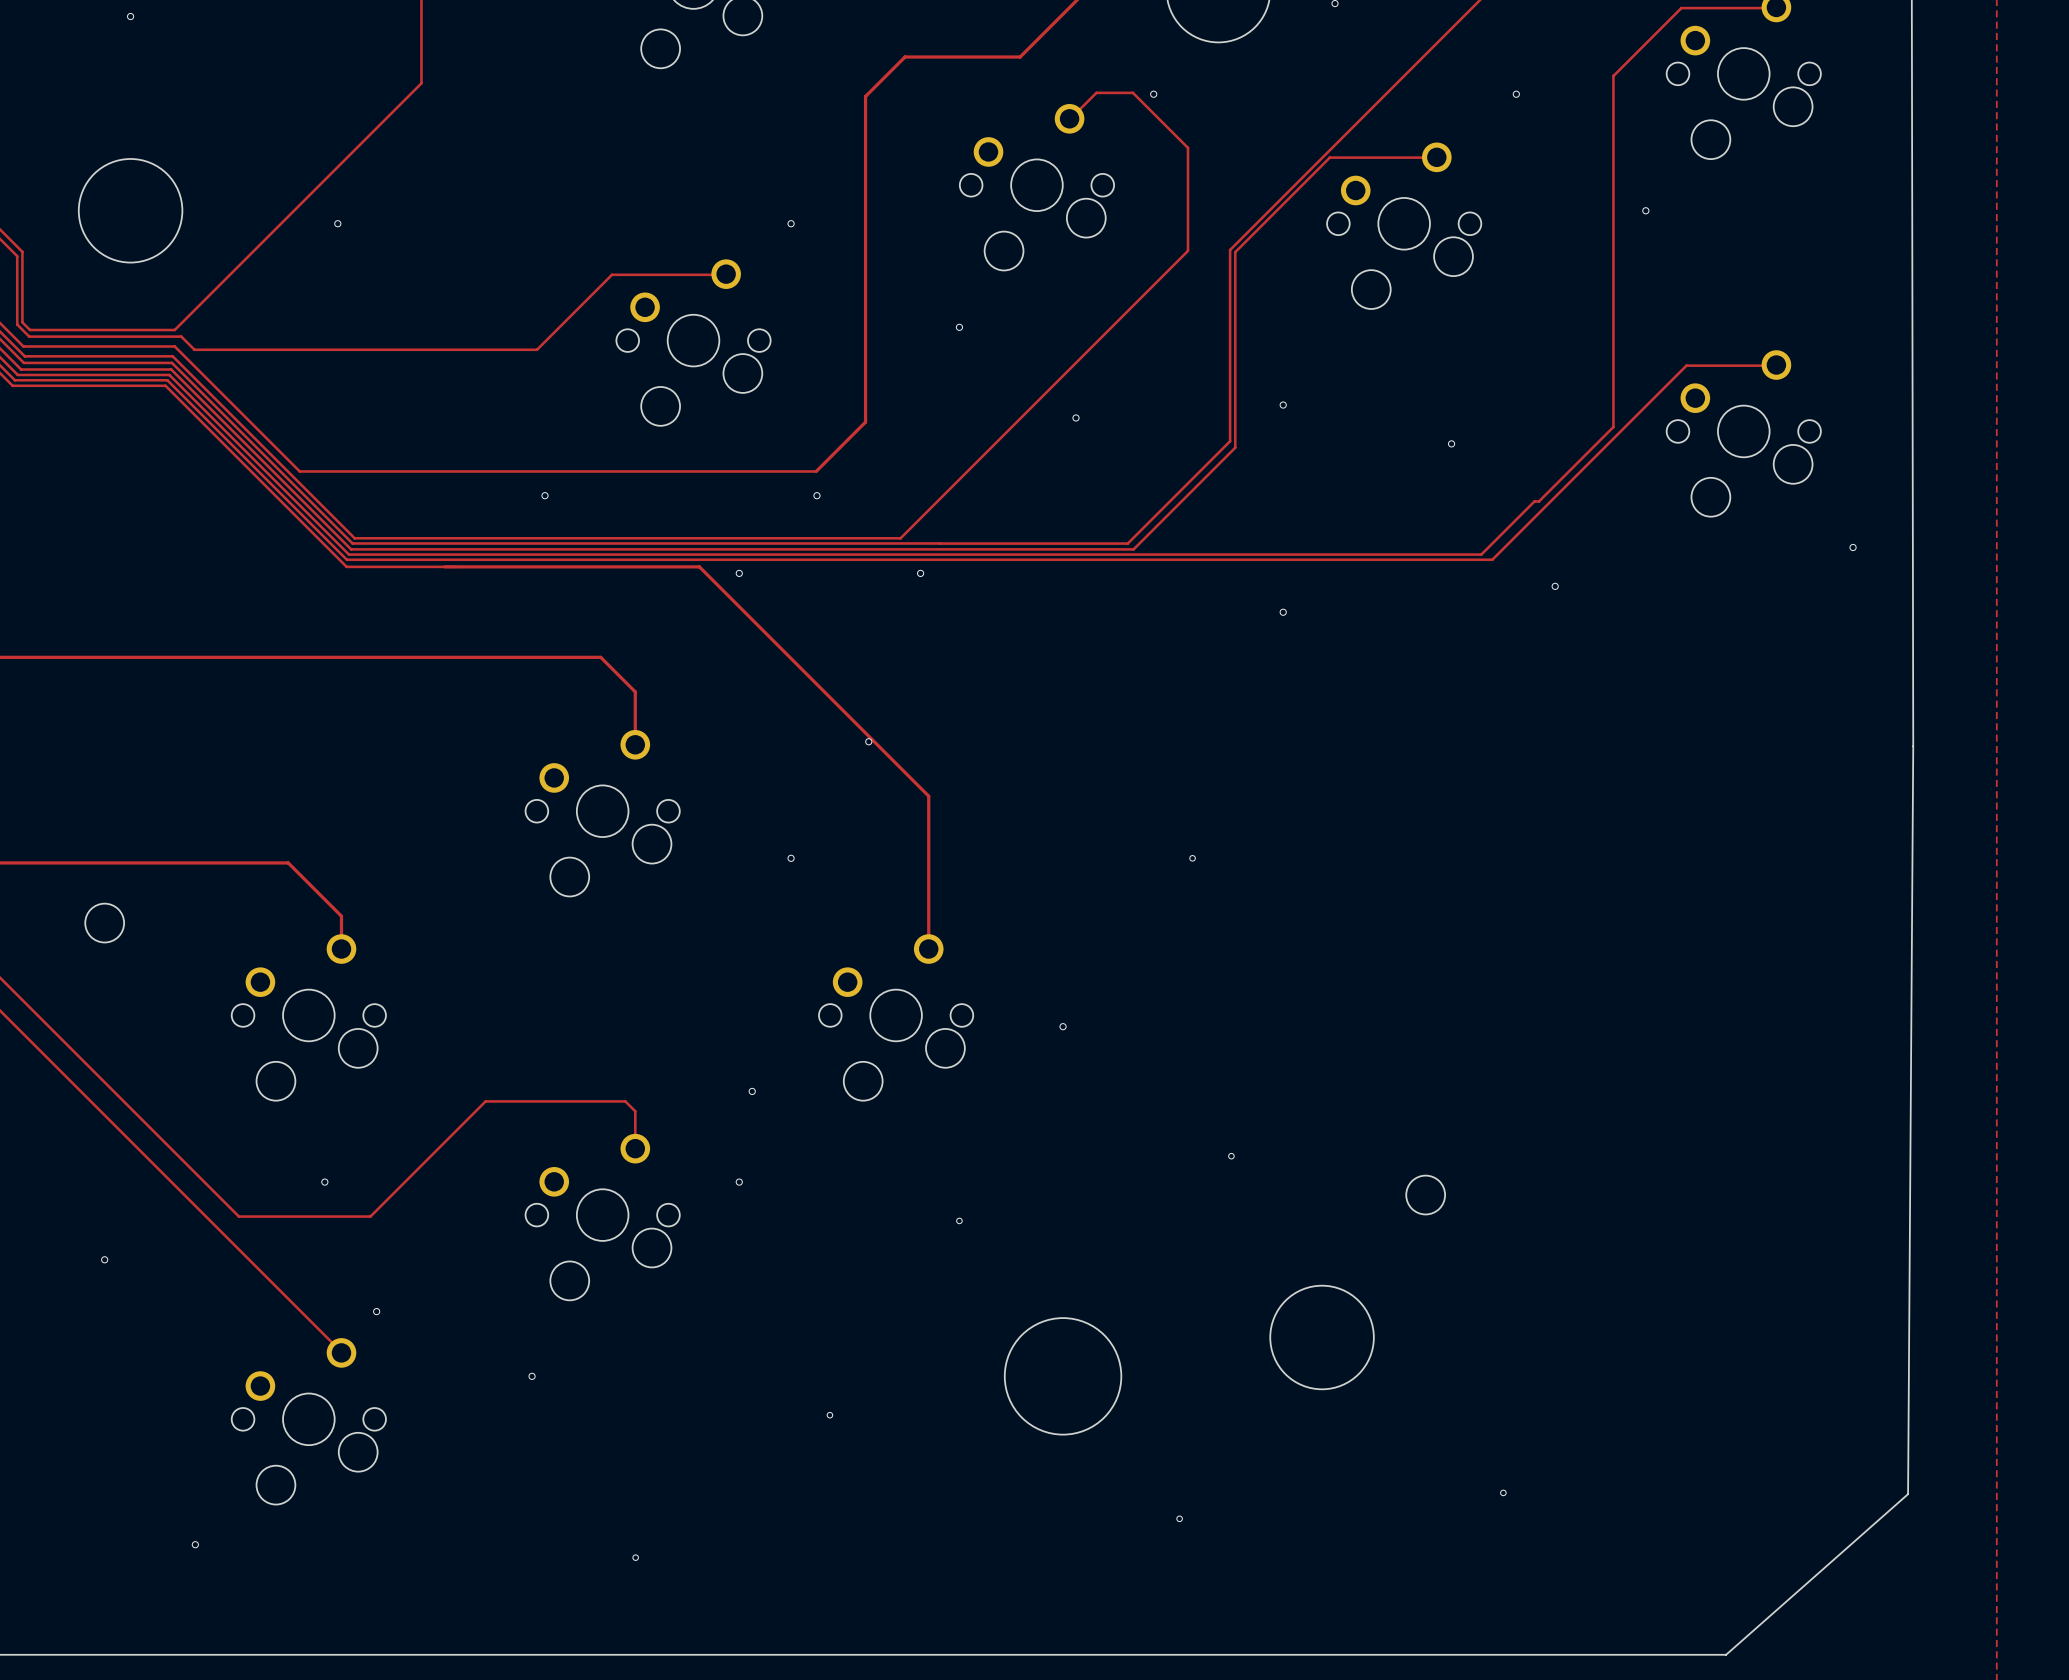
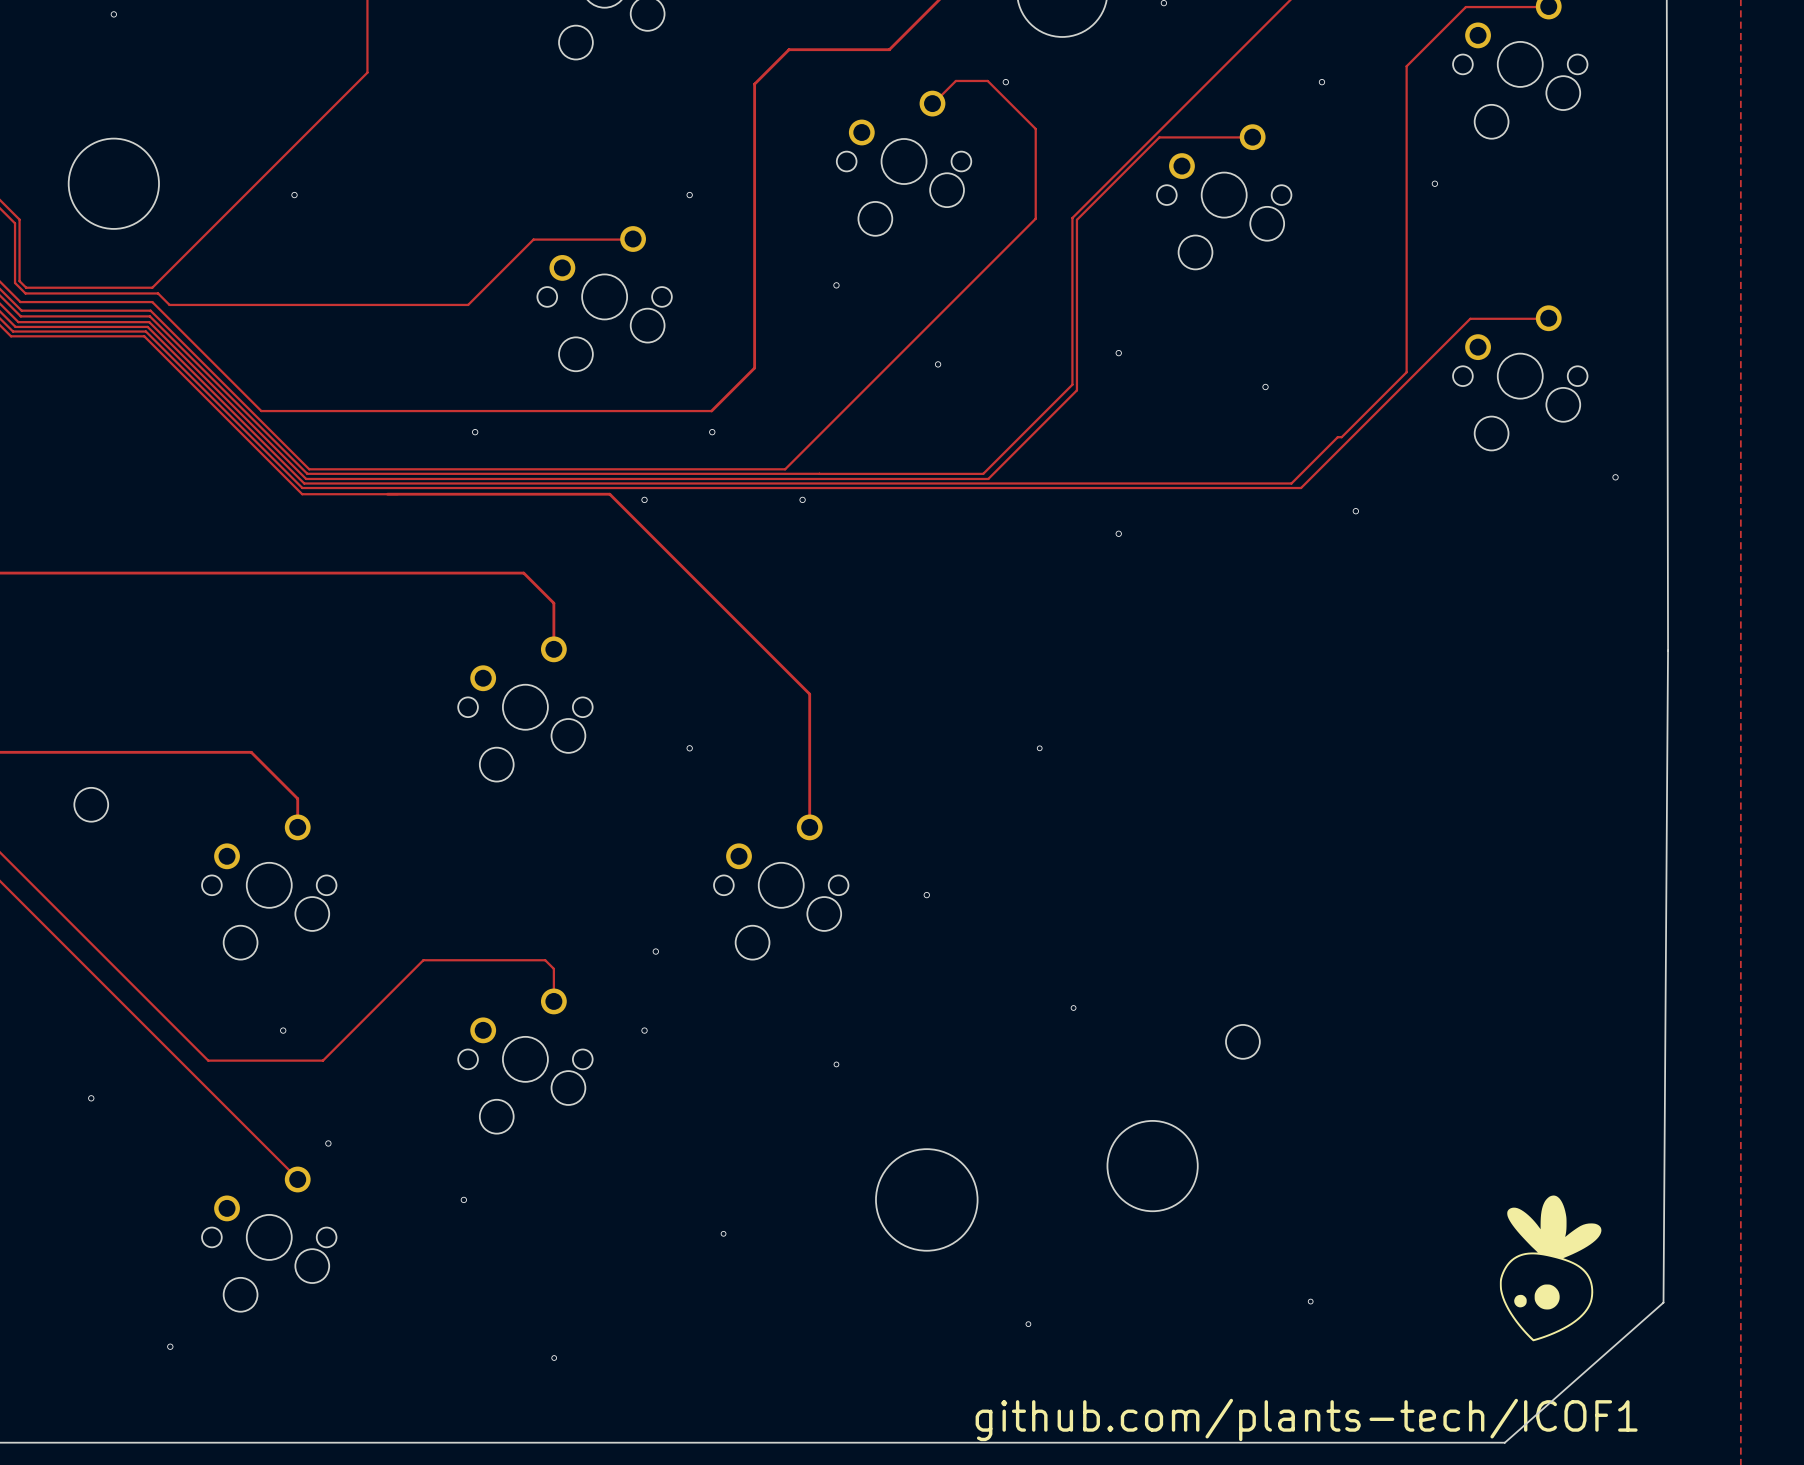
via: (868, 741) -> none
drawing: none -> [1499, 1195, 1602, 1342]
text: none -> github.com/plants-tech/ICOF1 (1306, 1419)

